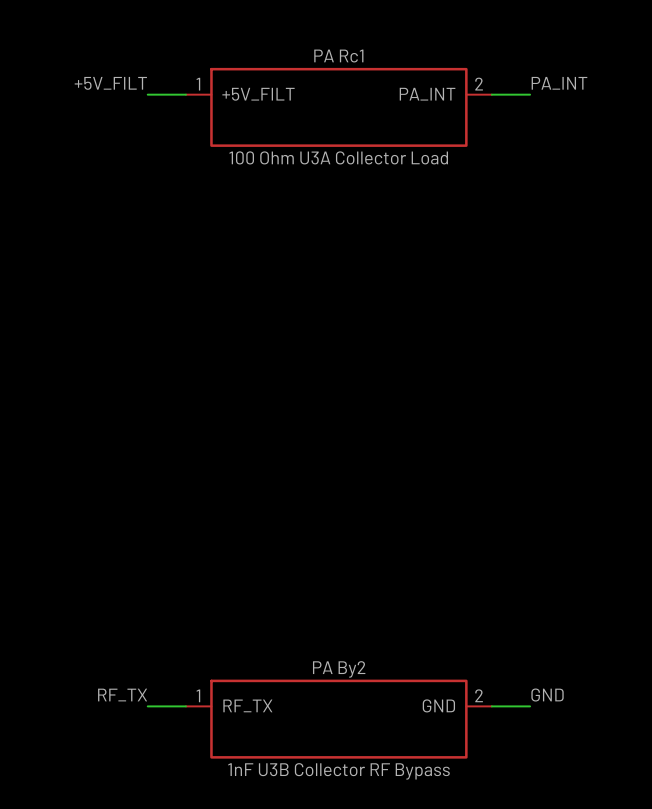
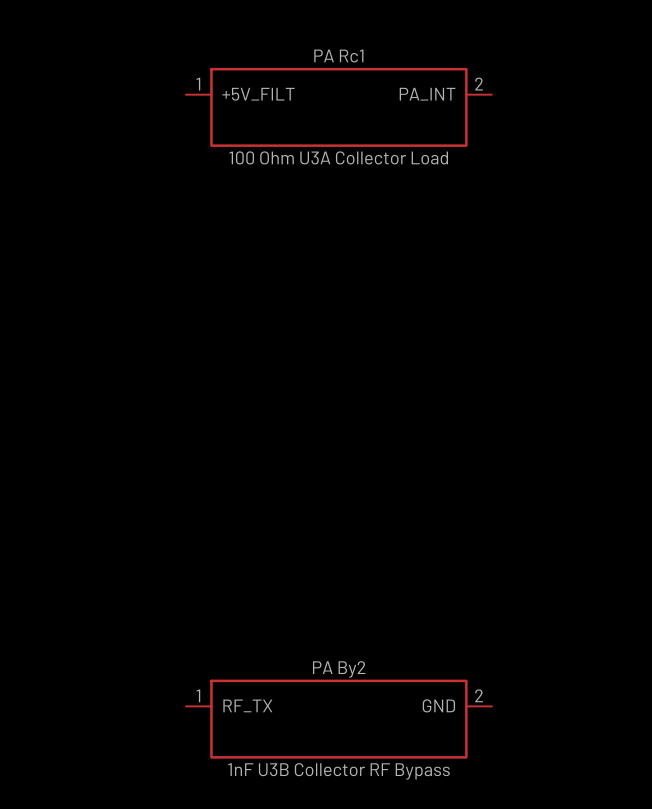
label: +5V_FILT (110, 83) -> none
label: PA_INT (559, 83) -> none
wire: (147, 94) (185, 94) -> none
wire: (491, 94) (530, 94) -> none
label: RF_TX (122, 695) -> none
label: GND (547, 695) -> none
wire: (147, 706) (185, 706) -> none
wire: (491, 706) (530, 706) -> none

